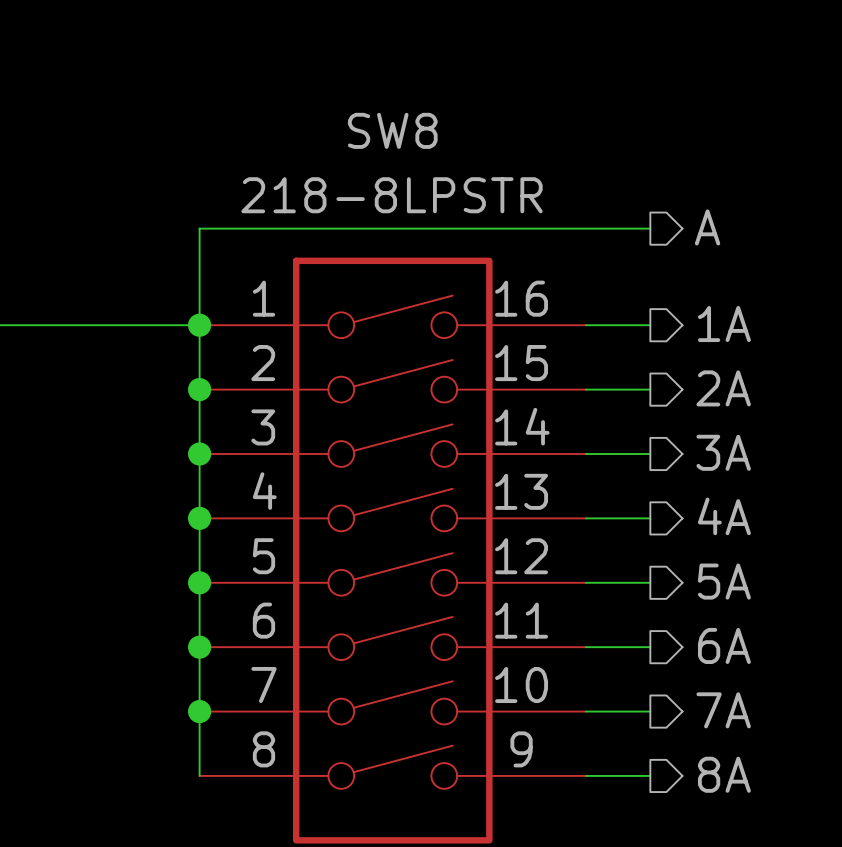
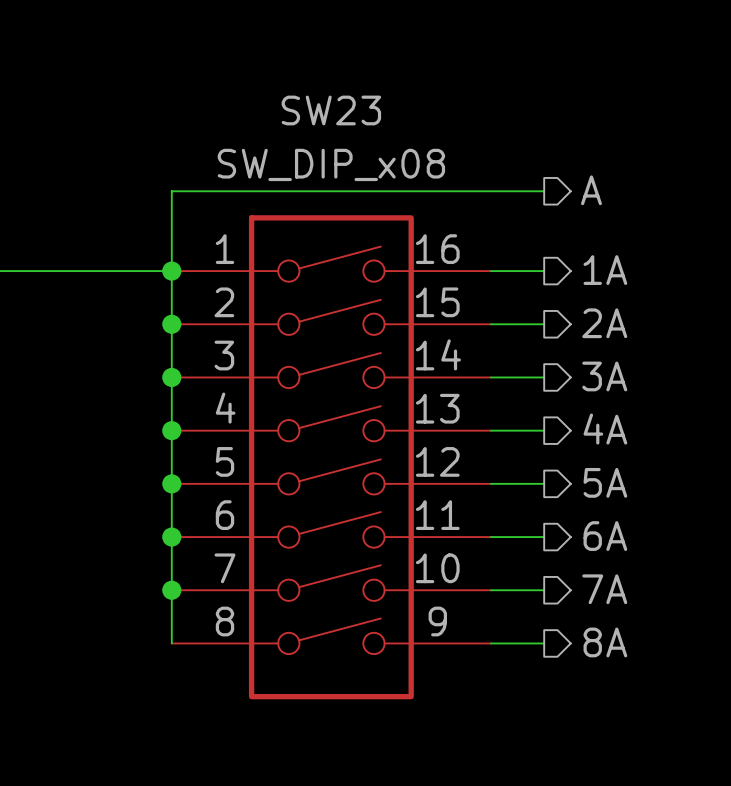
SW8 name: SW8 (392, 130) -> SW23 (331, 110)
SW8 value: 218-8LPSTR (392, 195) -> SW_DIP_x08 (331, 164)

